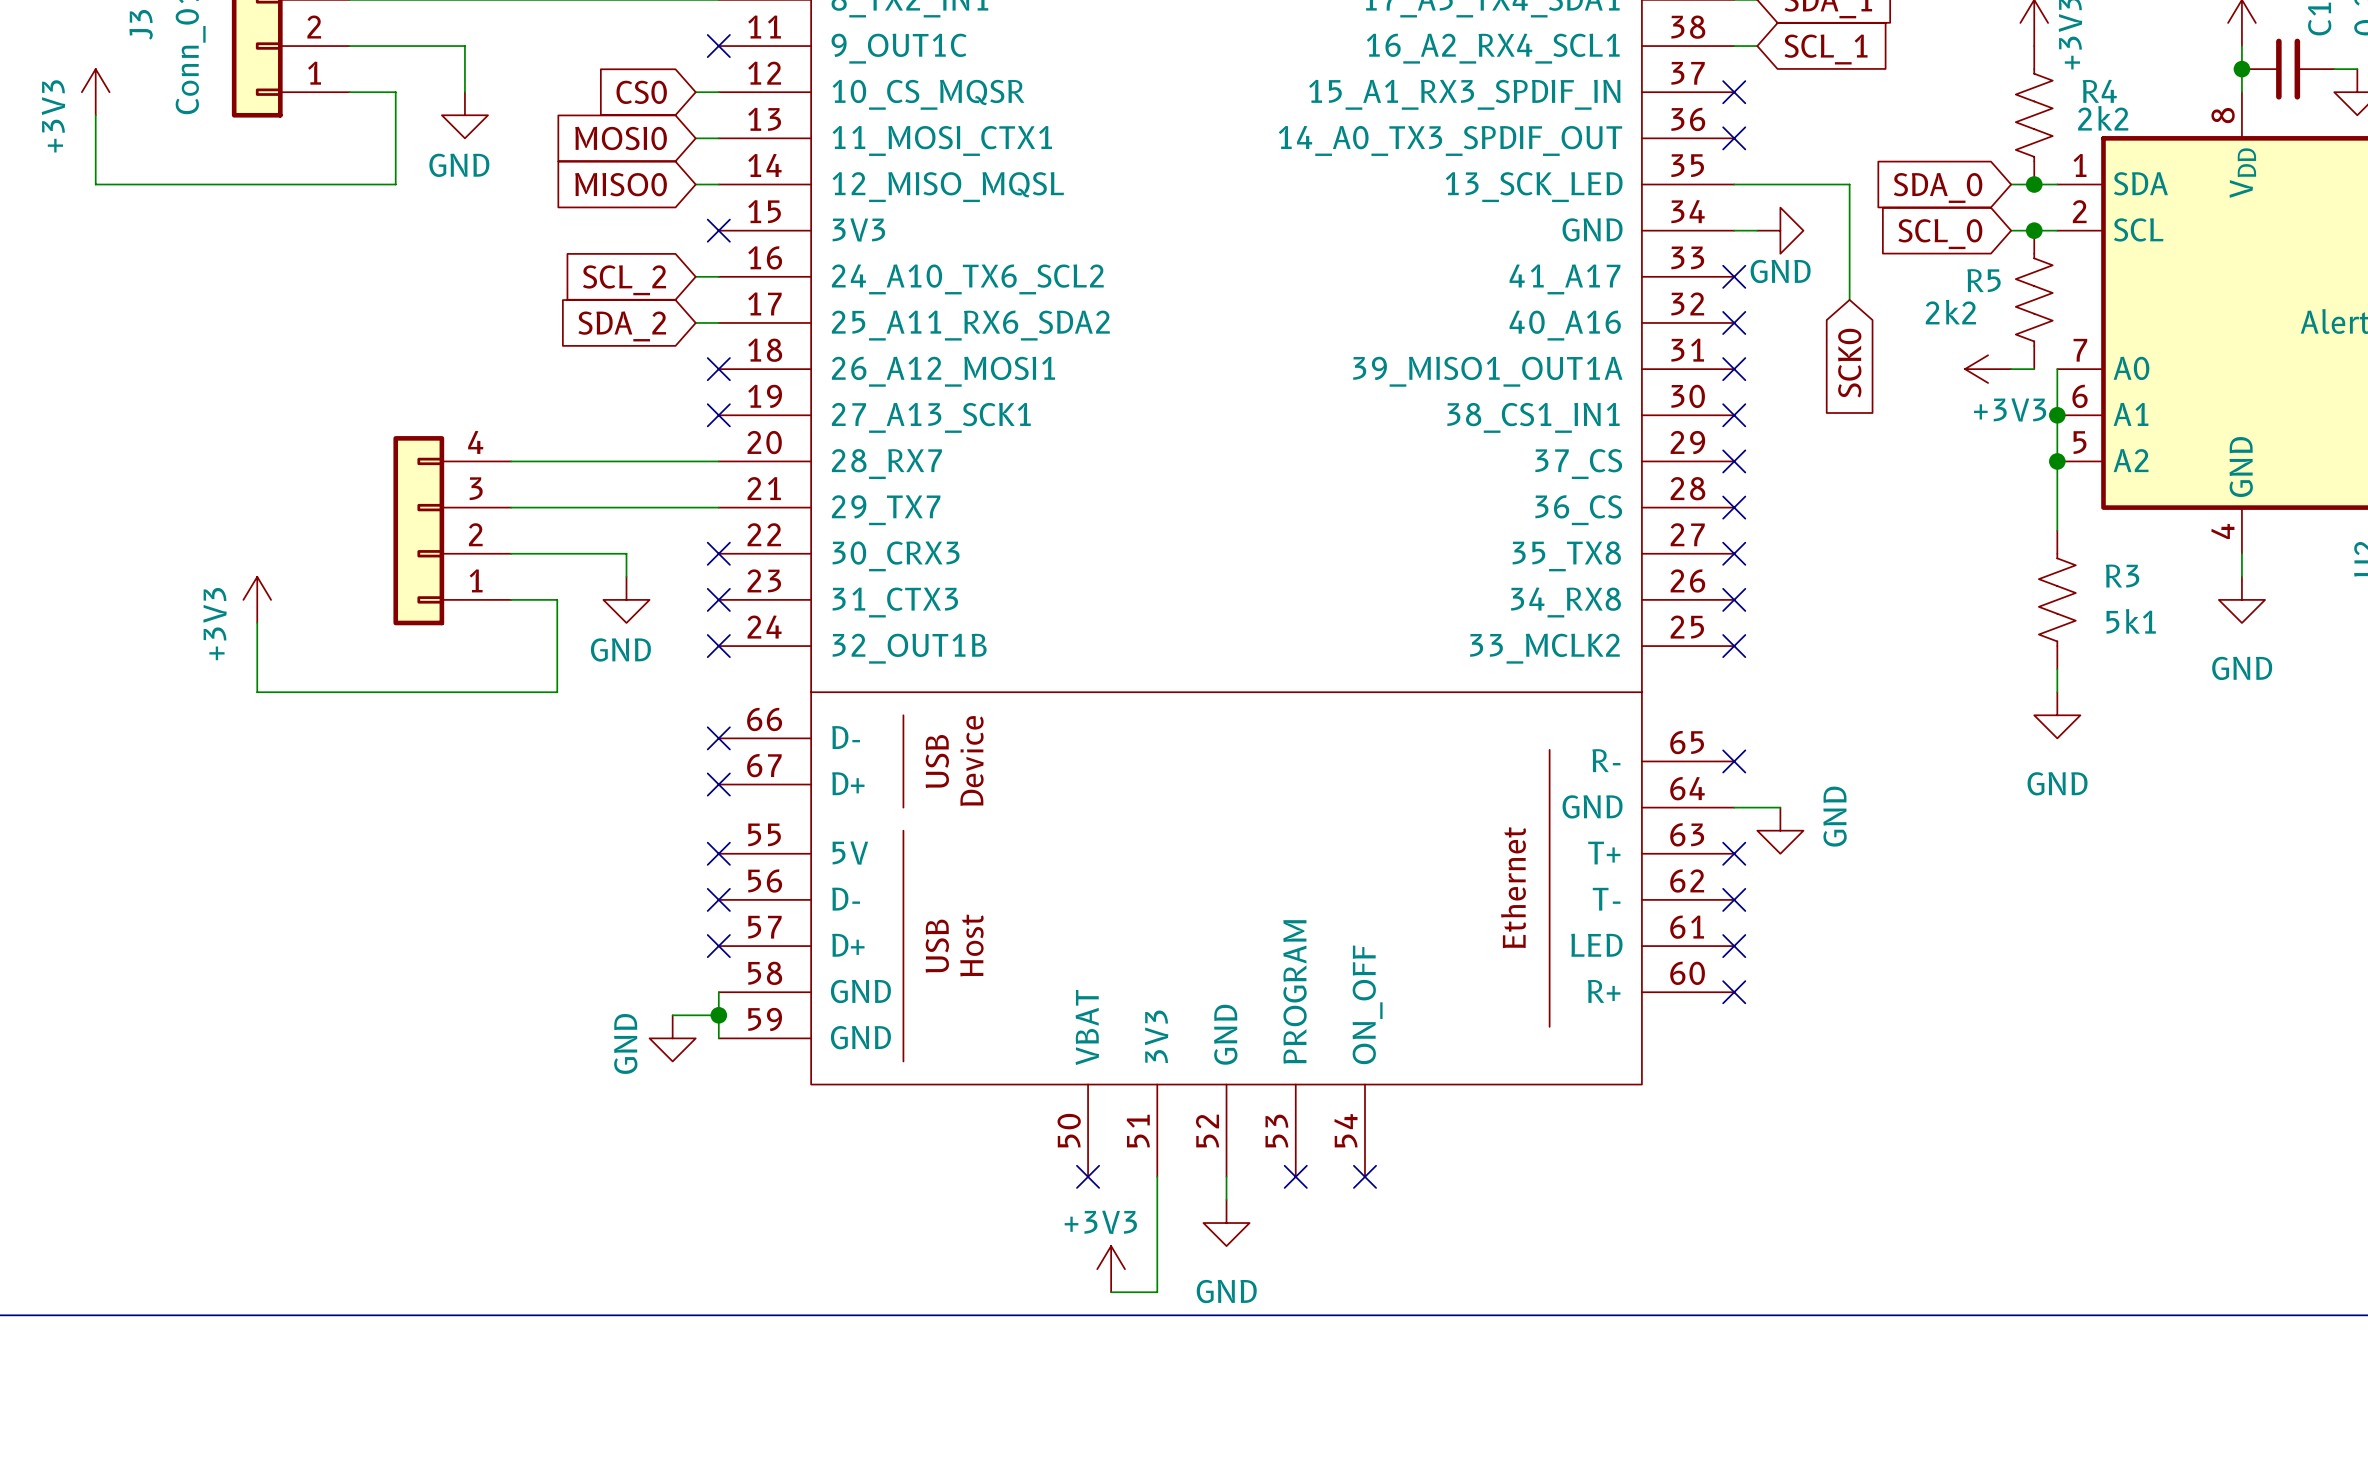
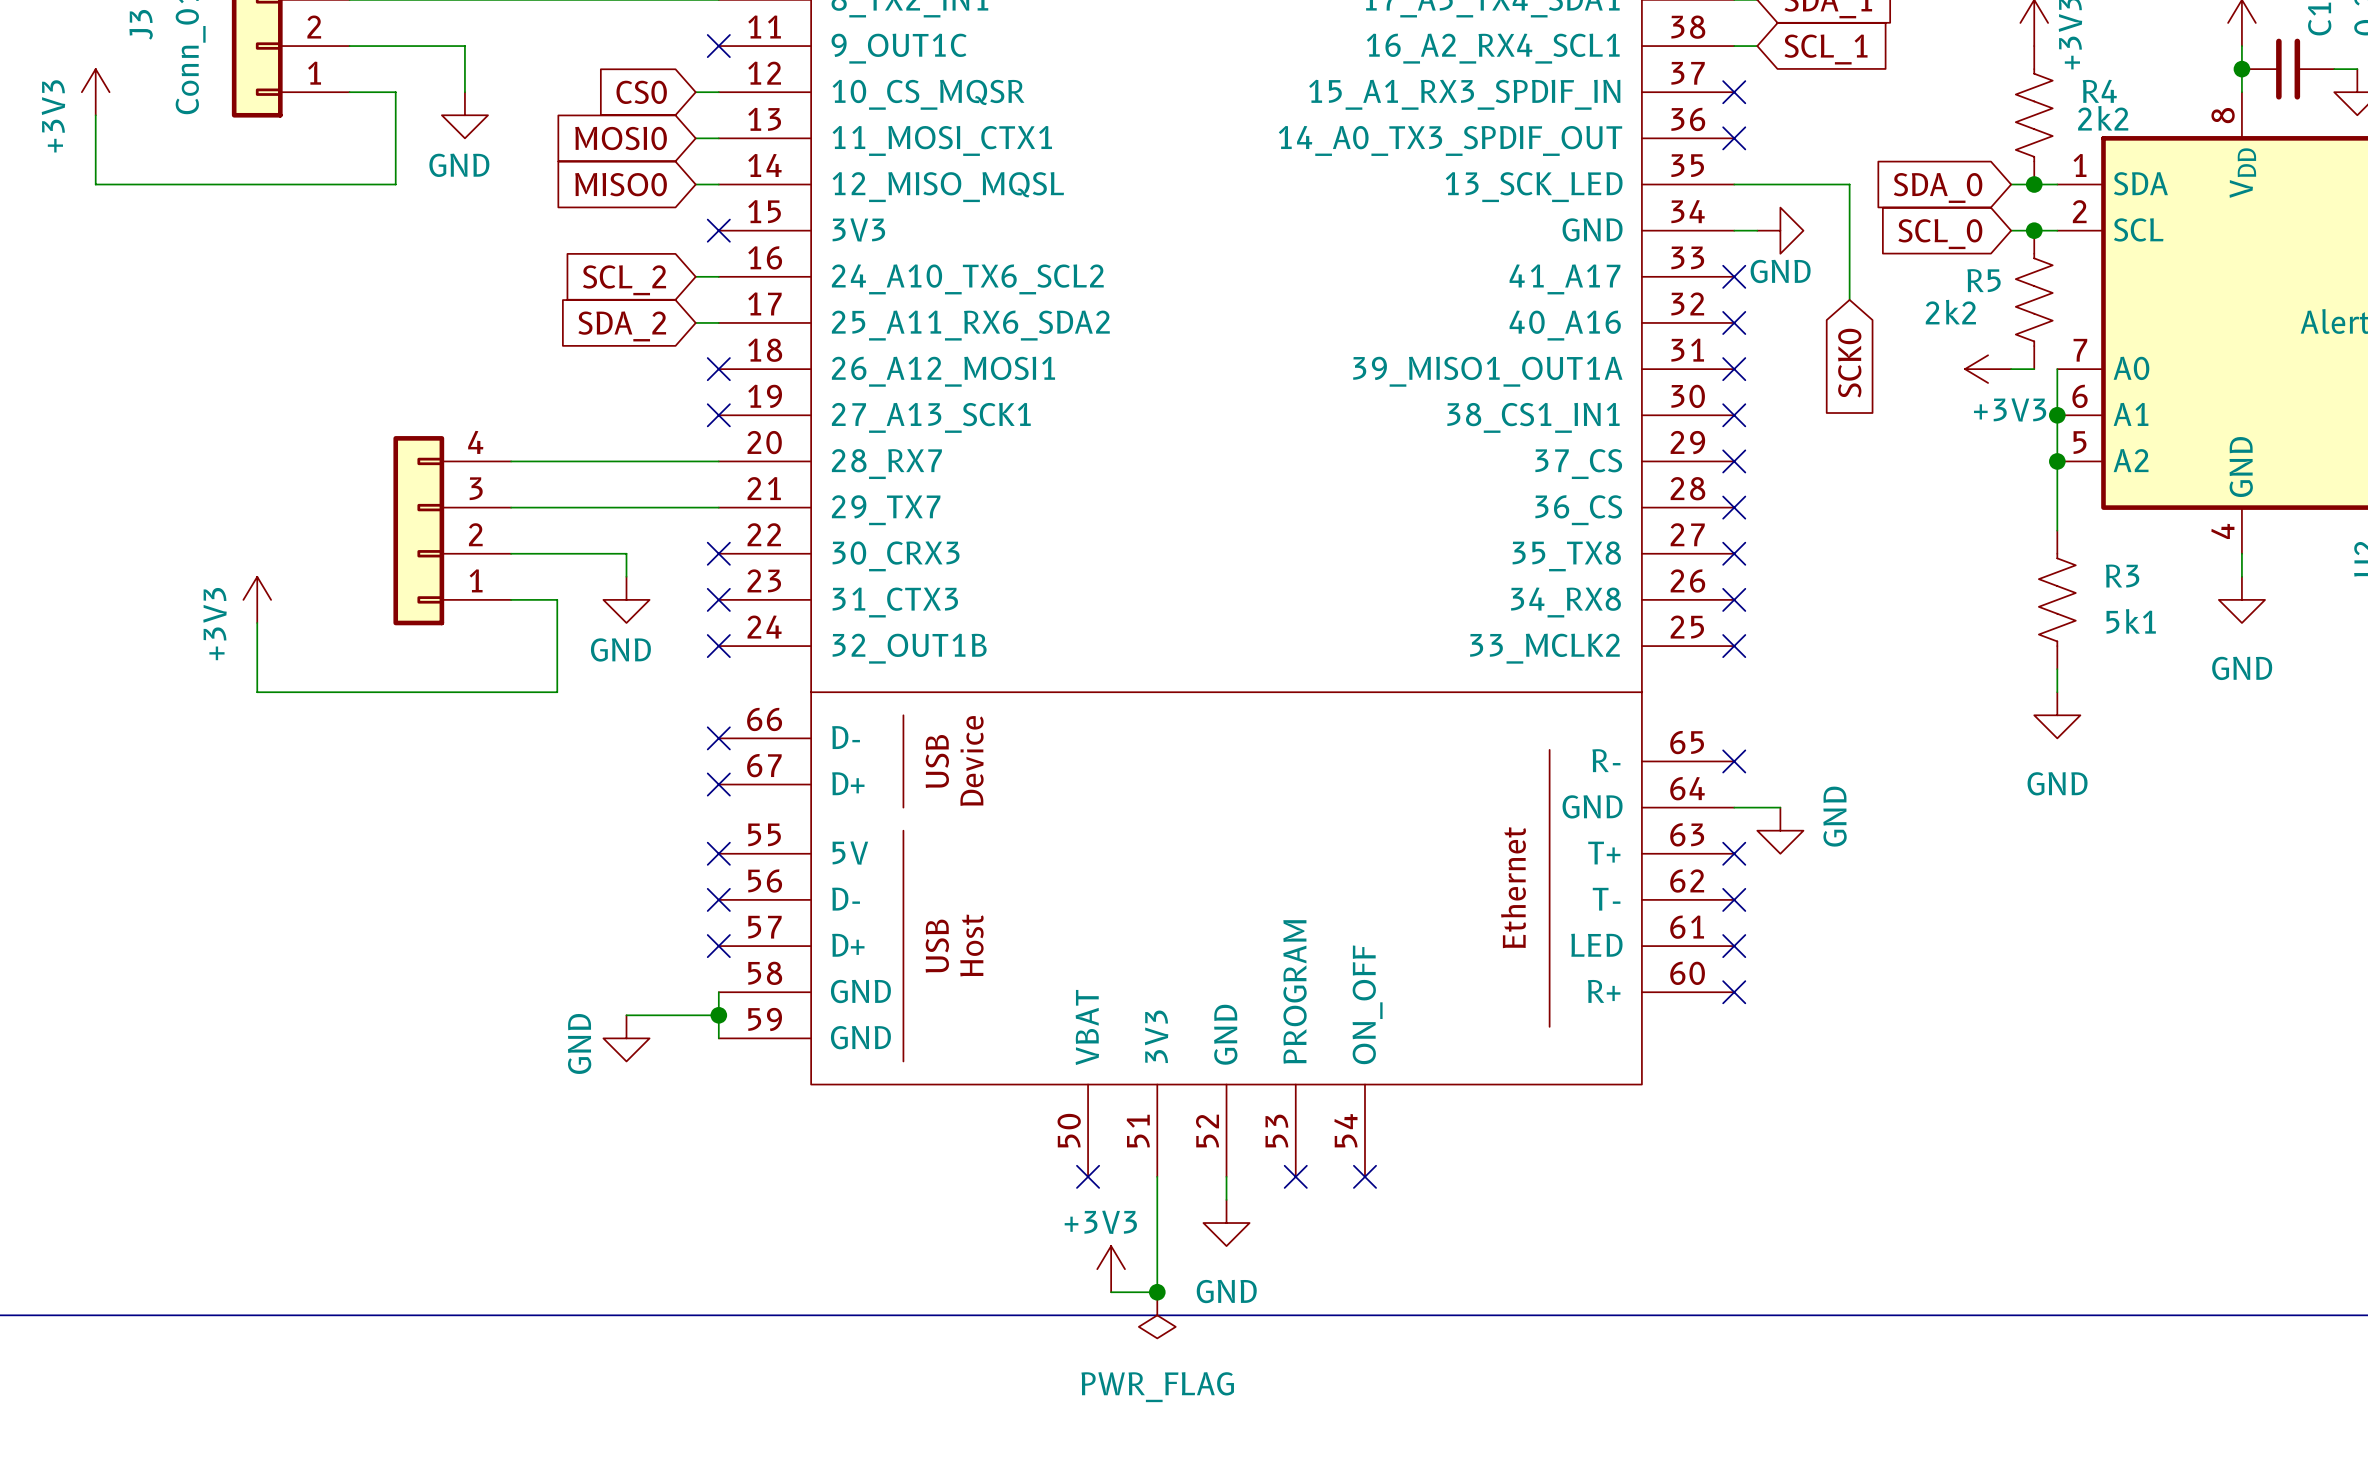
wire: none -> (626, 1015) (672, 1015)
power symbol position: GND (672, 1038) -> GND (626, 1038)
junction: none -> (1157, 1292)
power symbol: none -> PWR_FLAG (1157, 1315)

